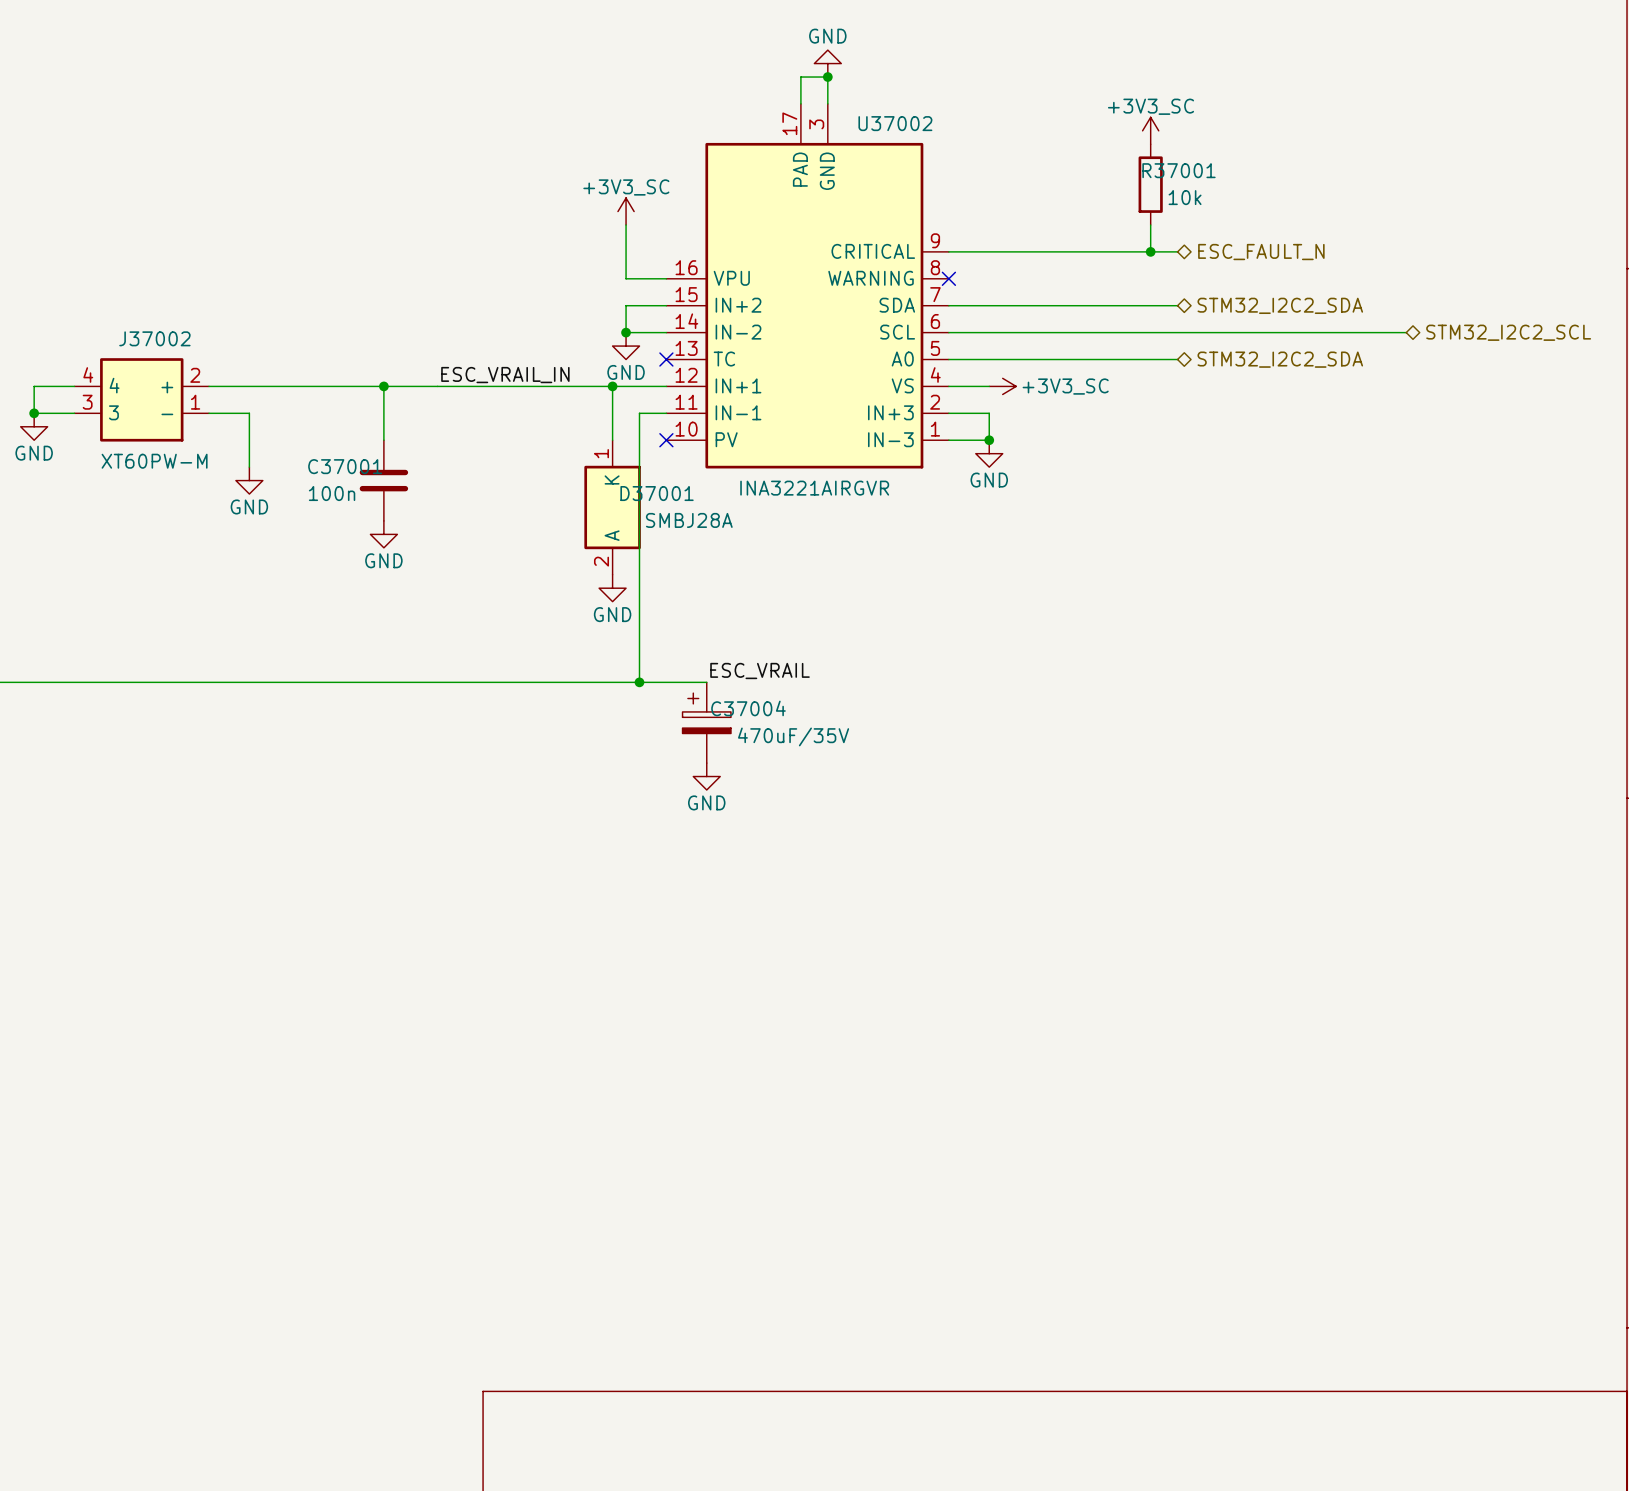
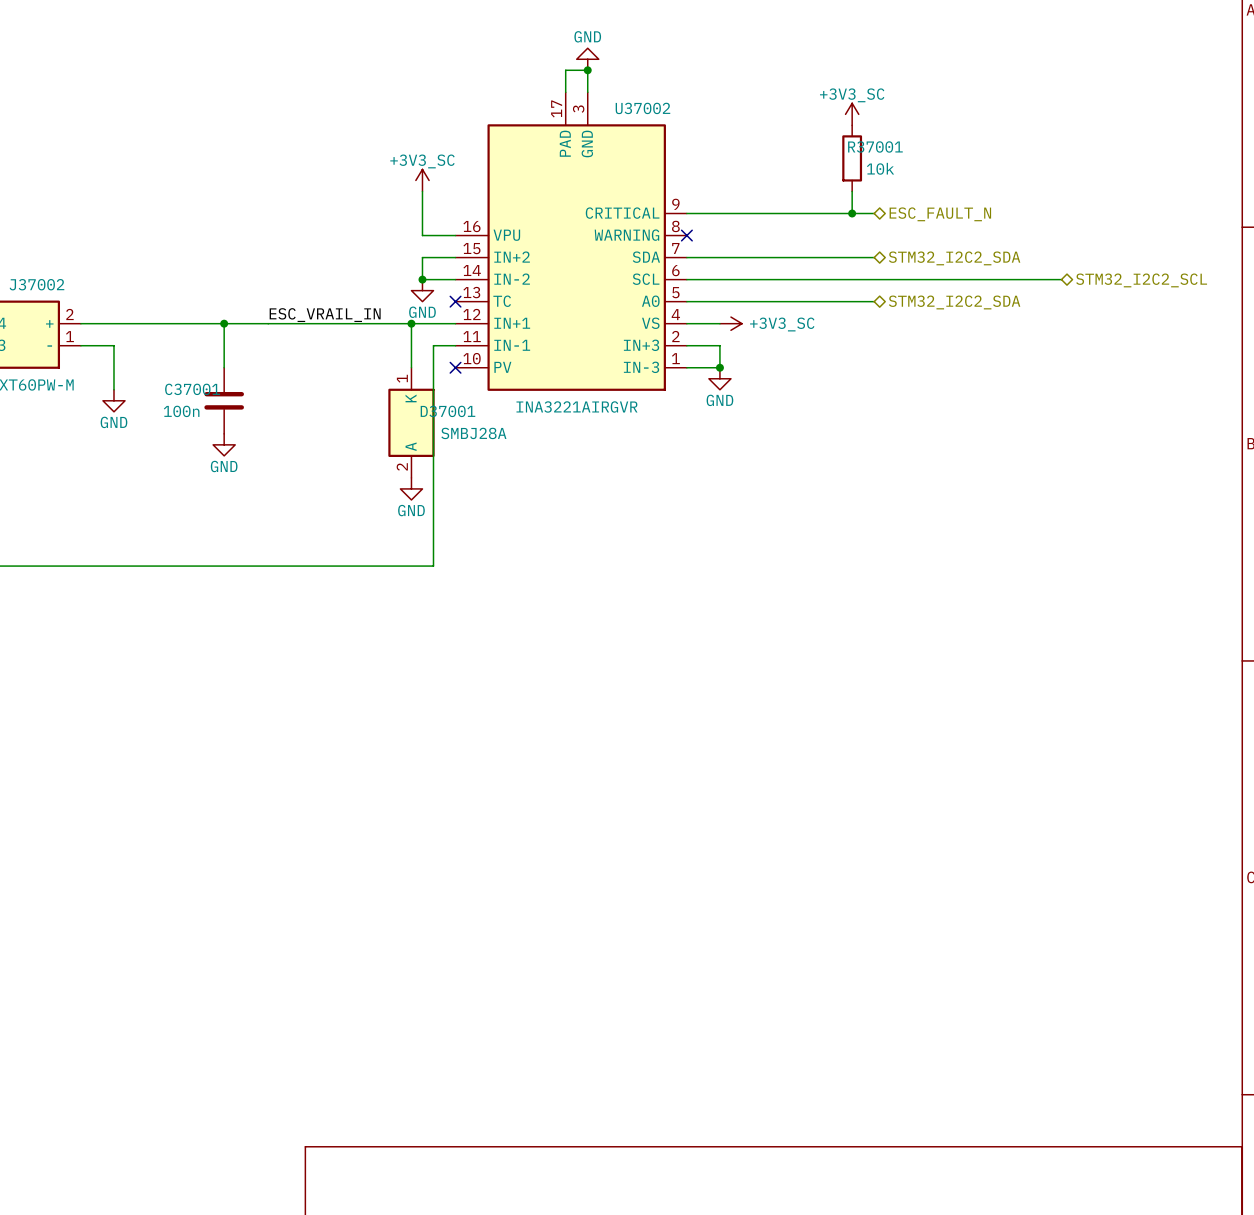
label: ESC_VRAIL (760, 671) -> none
wire: (639, 682) (706, 682) -> none
junction: (639, 682) -> none
C37004: 470uF/35V (706, 722) -> none
power symbol: GND (706, 776) -> none

